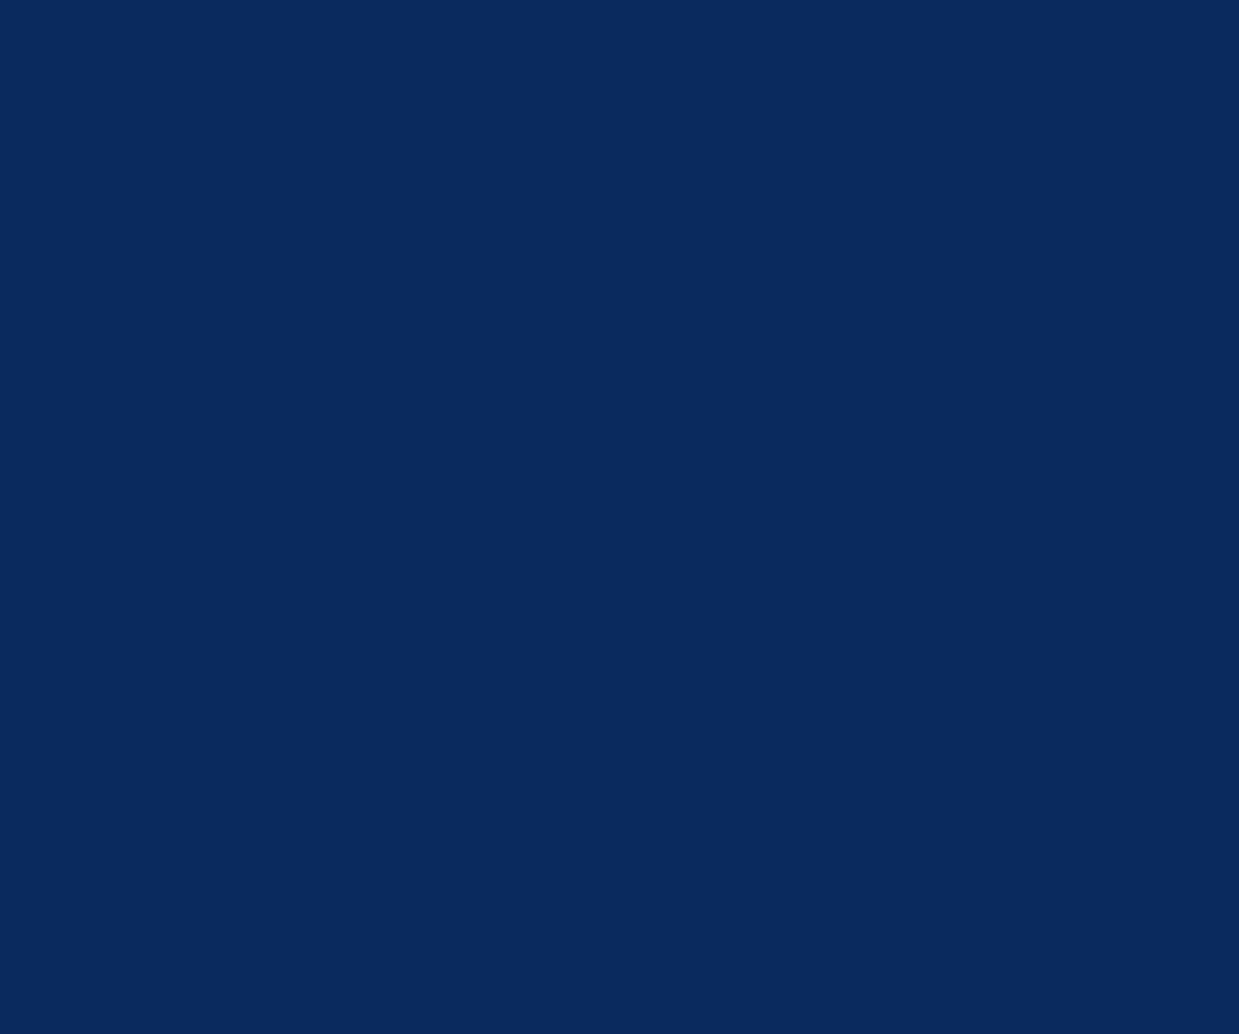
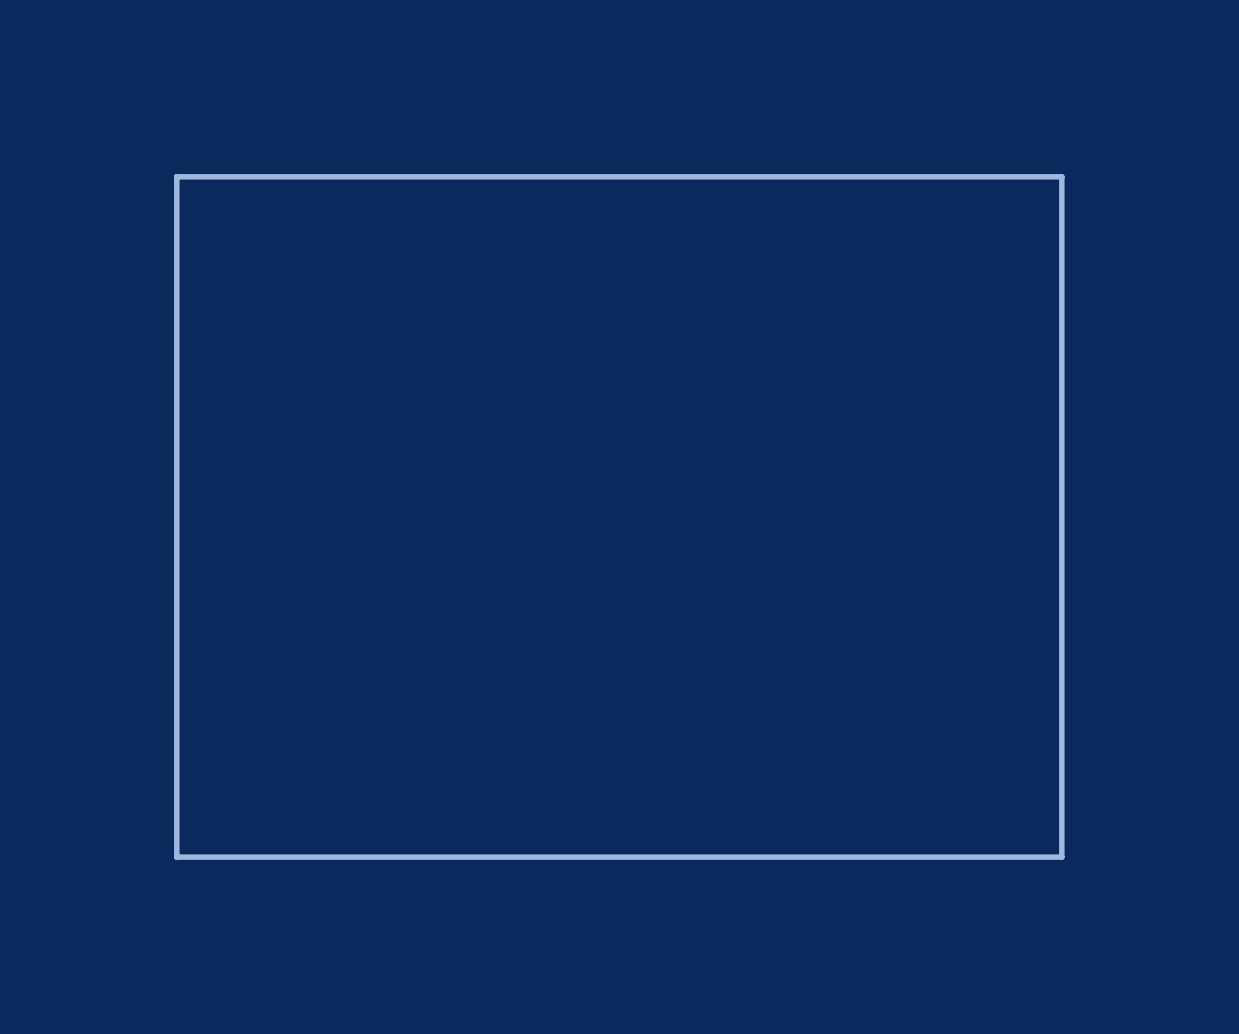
line: none -> (176, 176) (1061, 176) (1061, 857) (176, 857) (176, 176)

